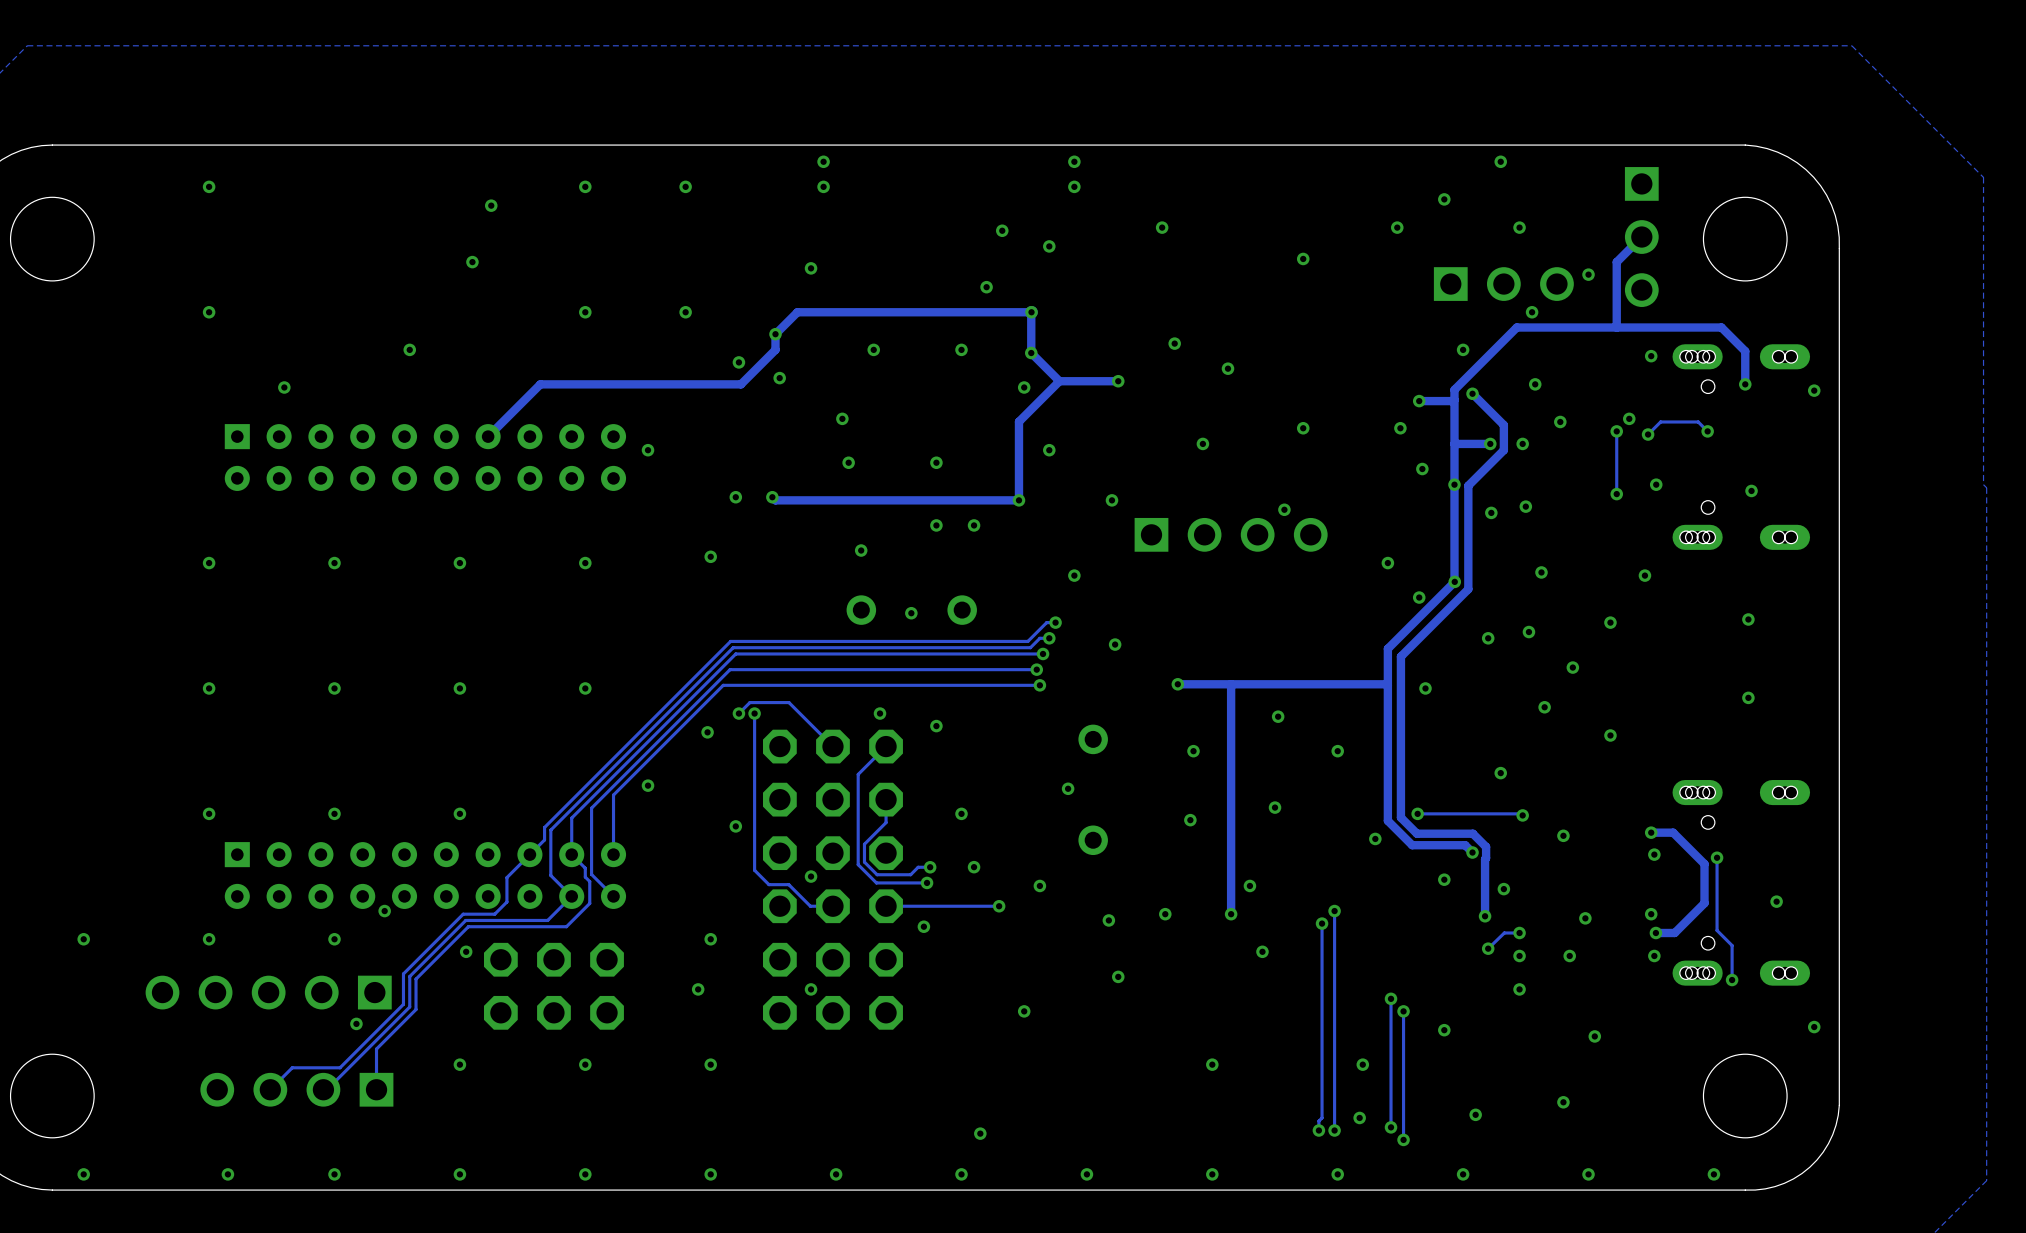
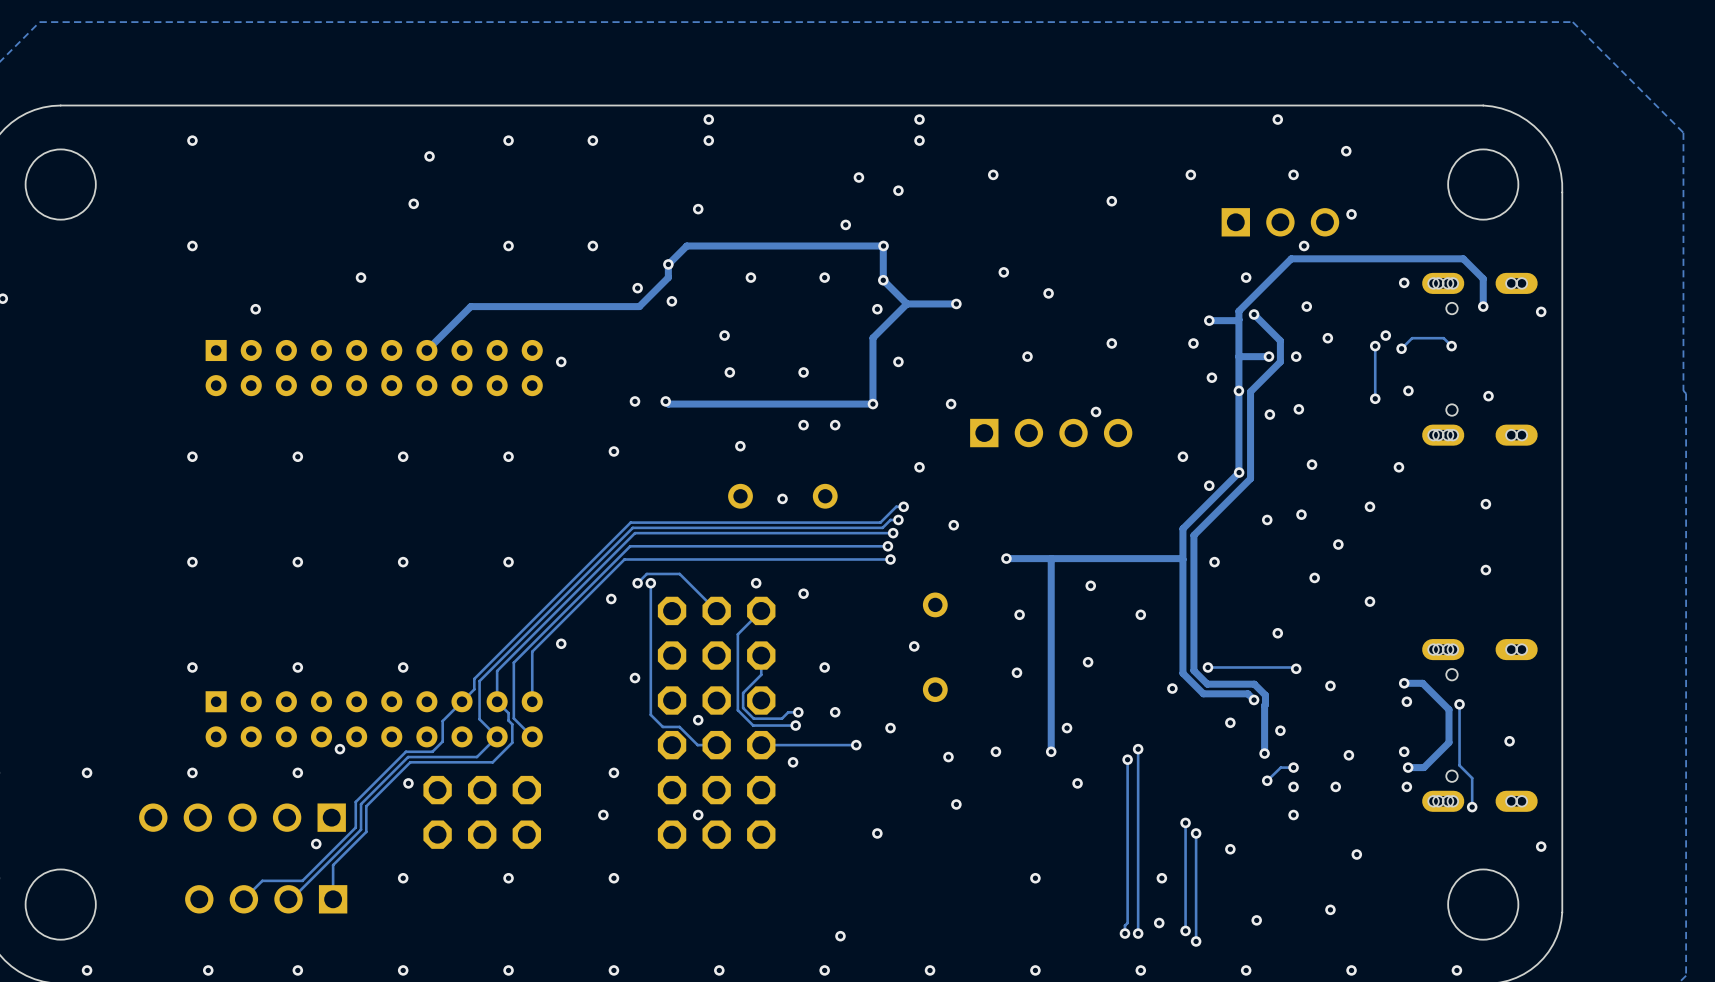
via: (1444, 199) -> none
via: none -> (1346, 151)
track: (1641, 237) (1616, 262) (1616, 327) -> none
part: (1641, 237) -> none

